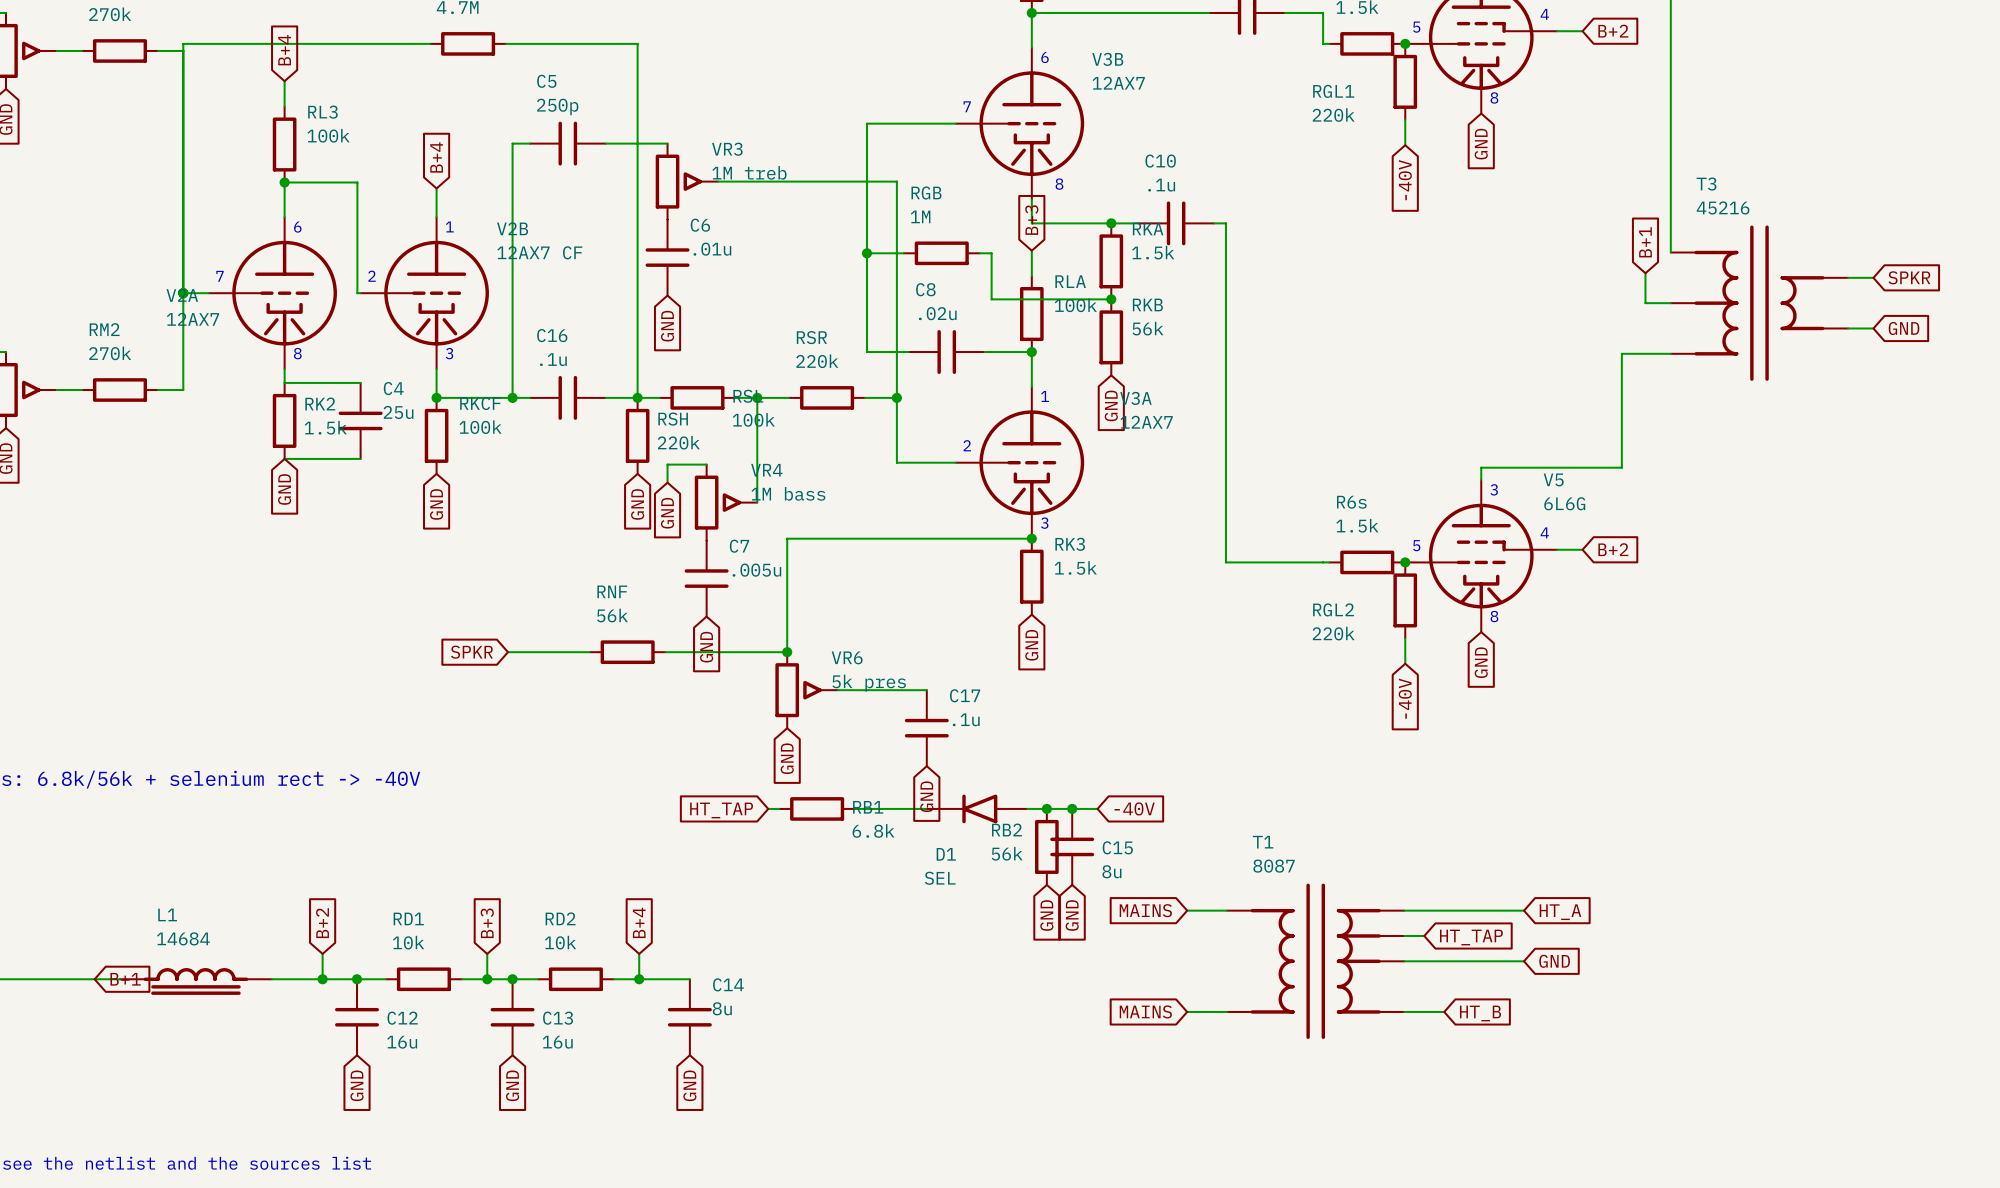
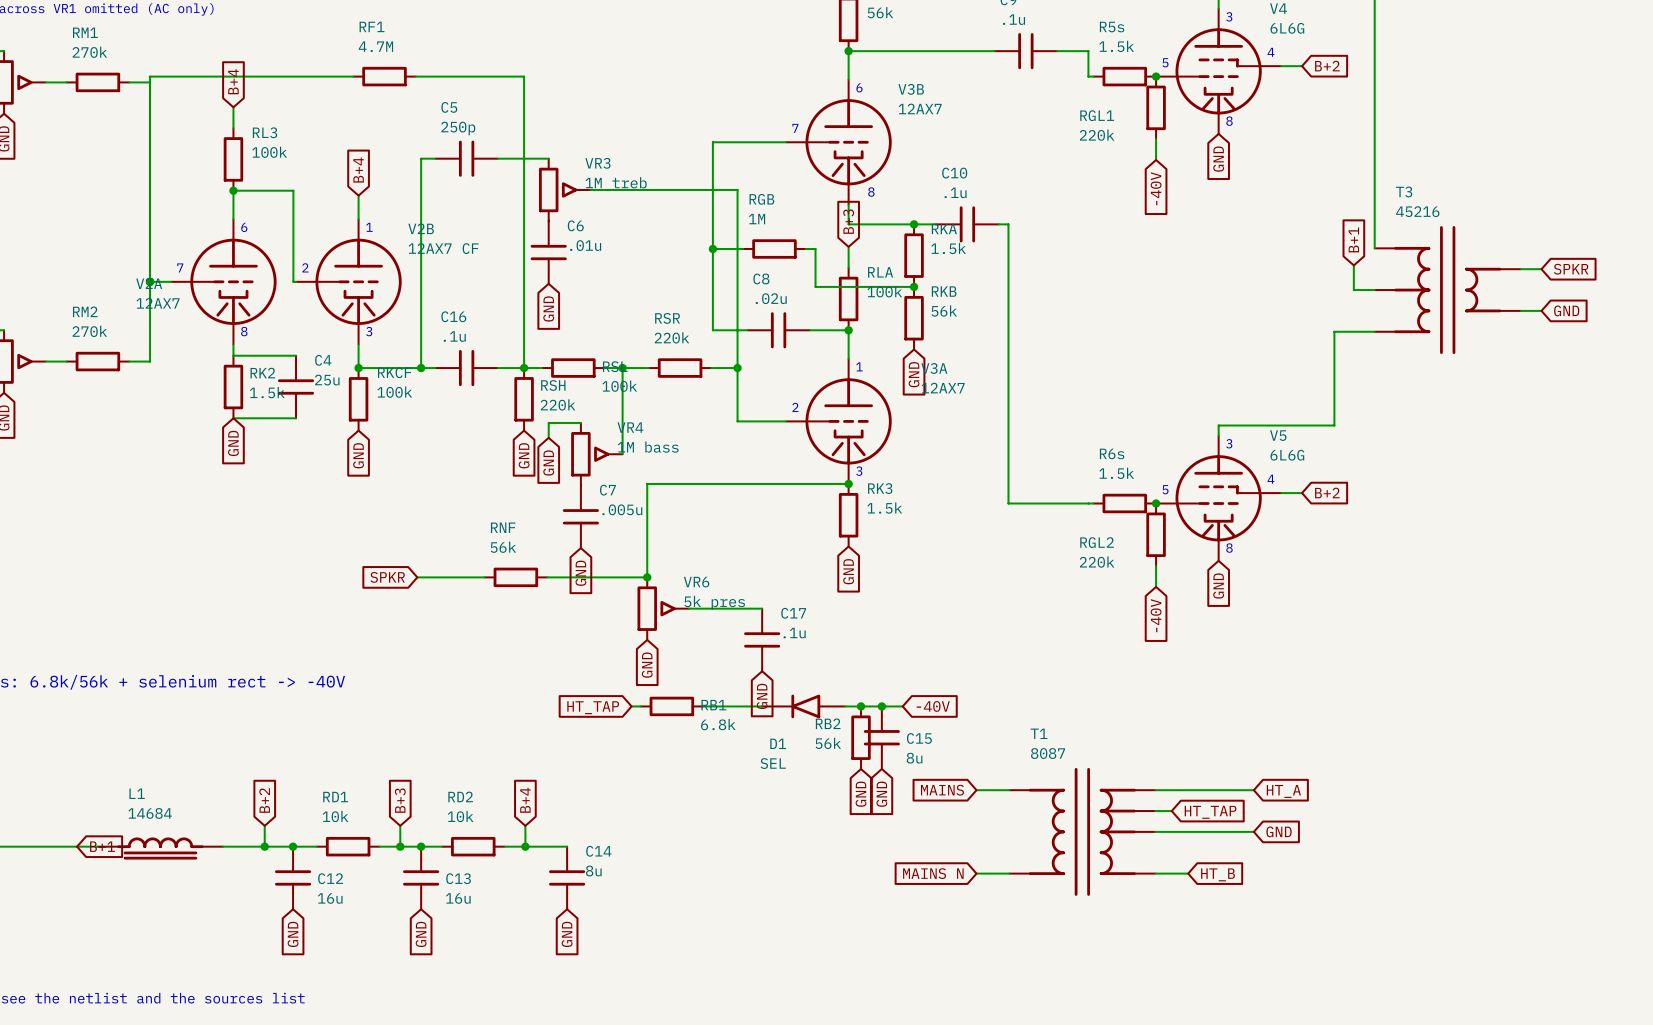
global label: MAINS (1145, 1011) -> MAINS N (933, 873)

